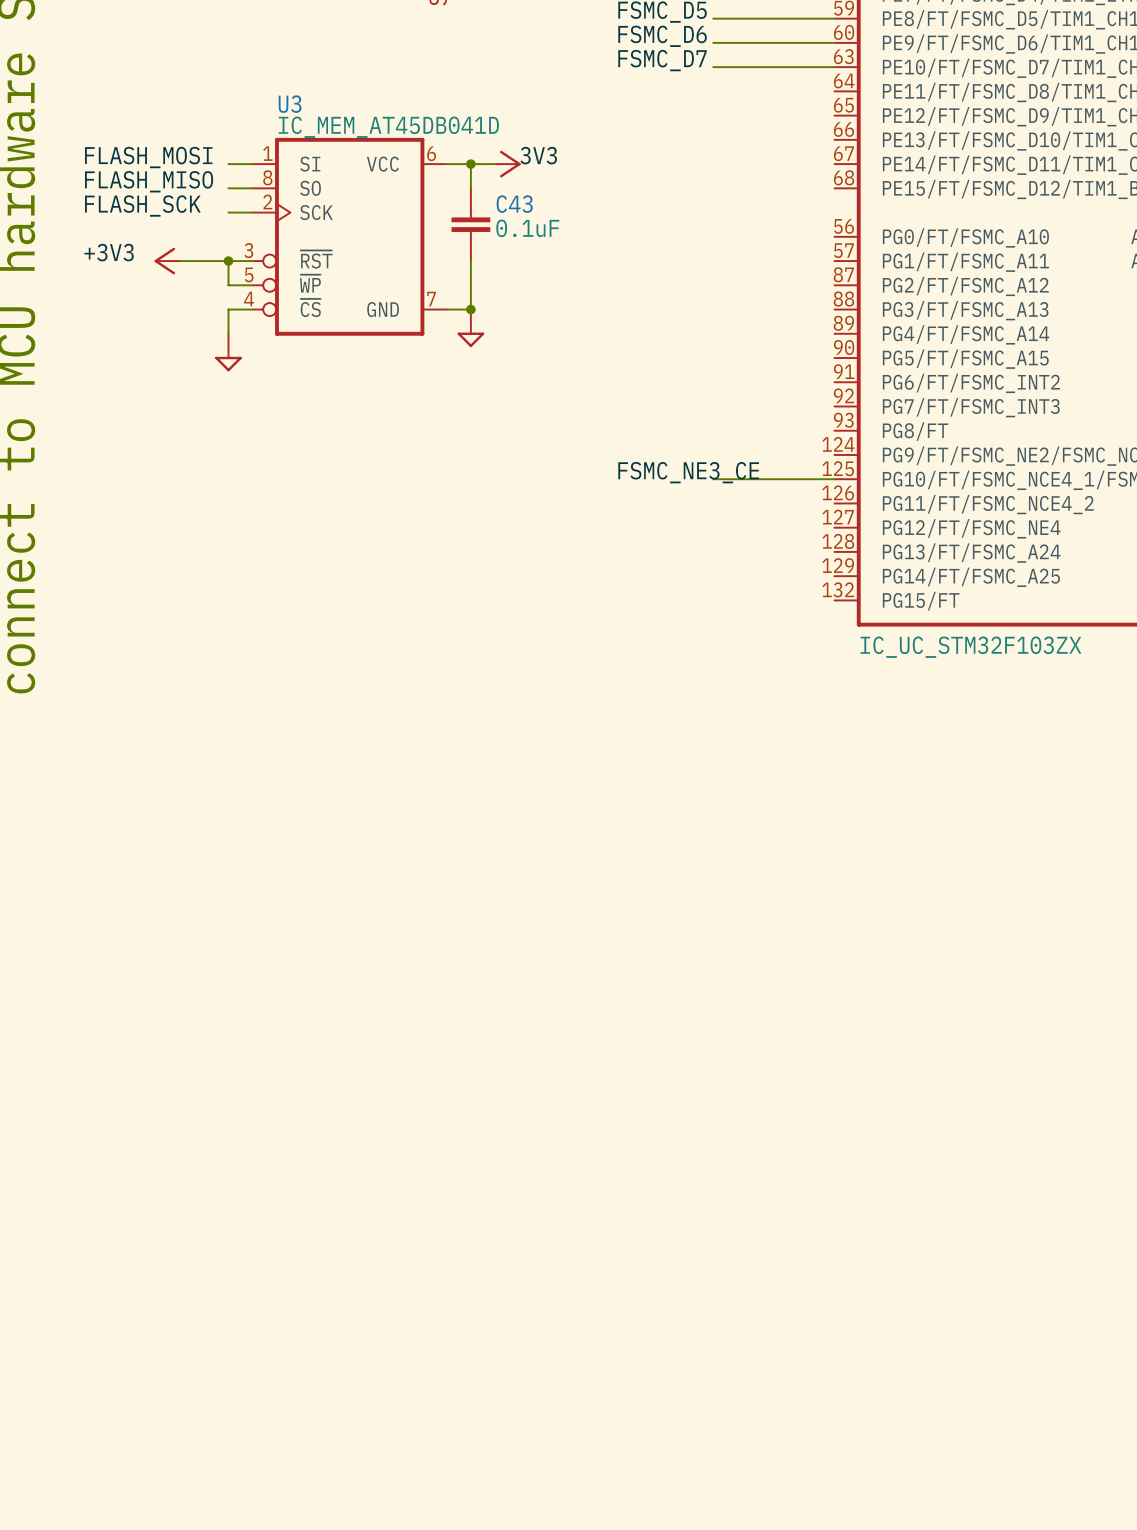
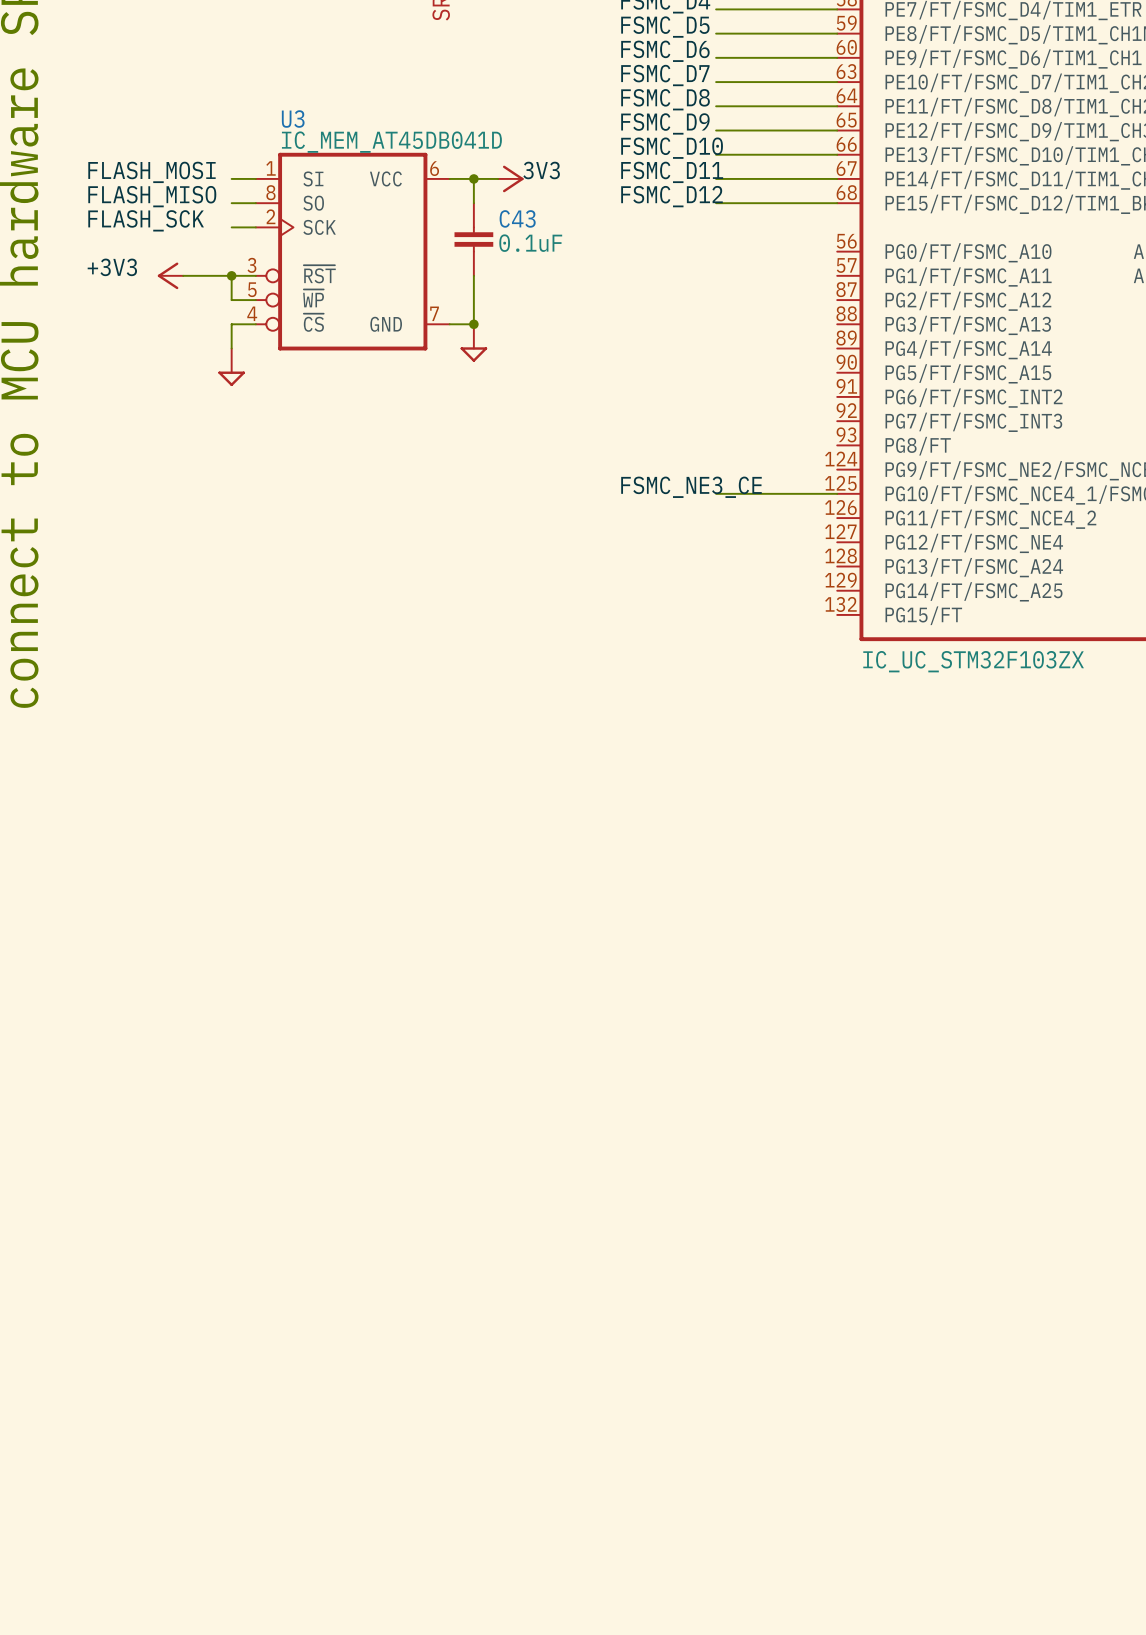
label: none -> FSMC_D8 (665, 99)
wire: none -> (716, 106) (837, 106)
label: none -> FSMC_D9 (665, 123)
wire: none -> (716, 130) (837, 130)
label: none -> FSMC_D10 (672, 148)
wire: none -> (716, 154) (837, 154)
label: none -> FSMC_D11 (672, 172)
wire: none -> (716, 178) (837, 178)
label: none -> FSMC_D12 (671, 196)
wire: none -> (716, 203) (837, 203)

